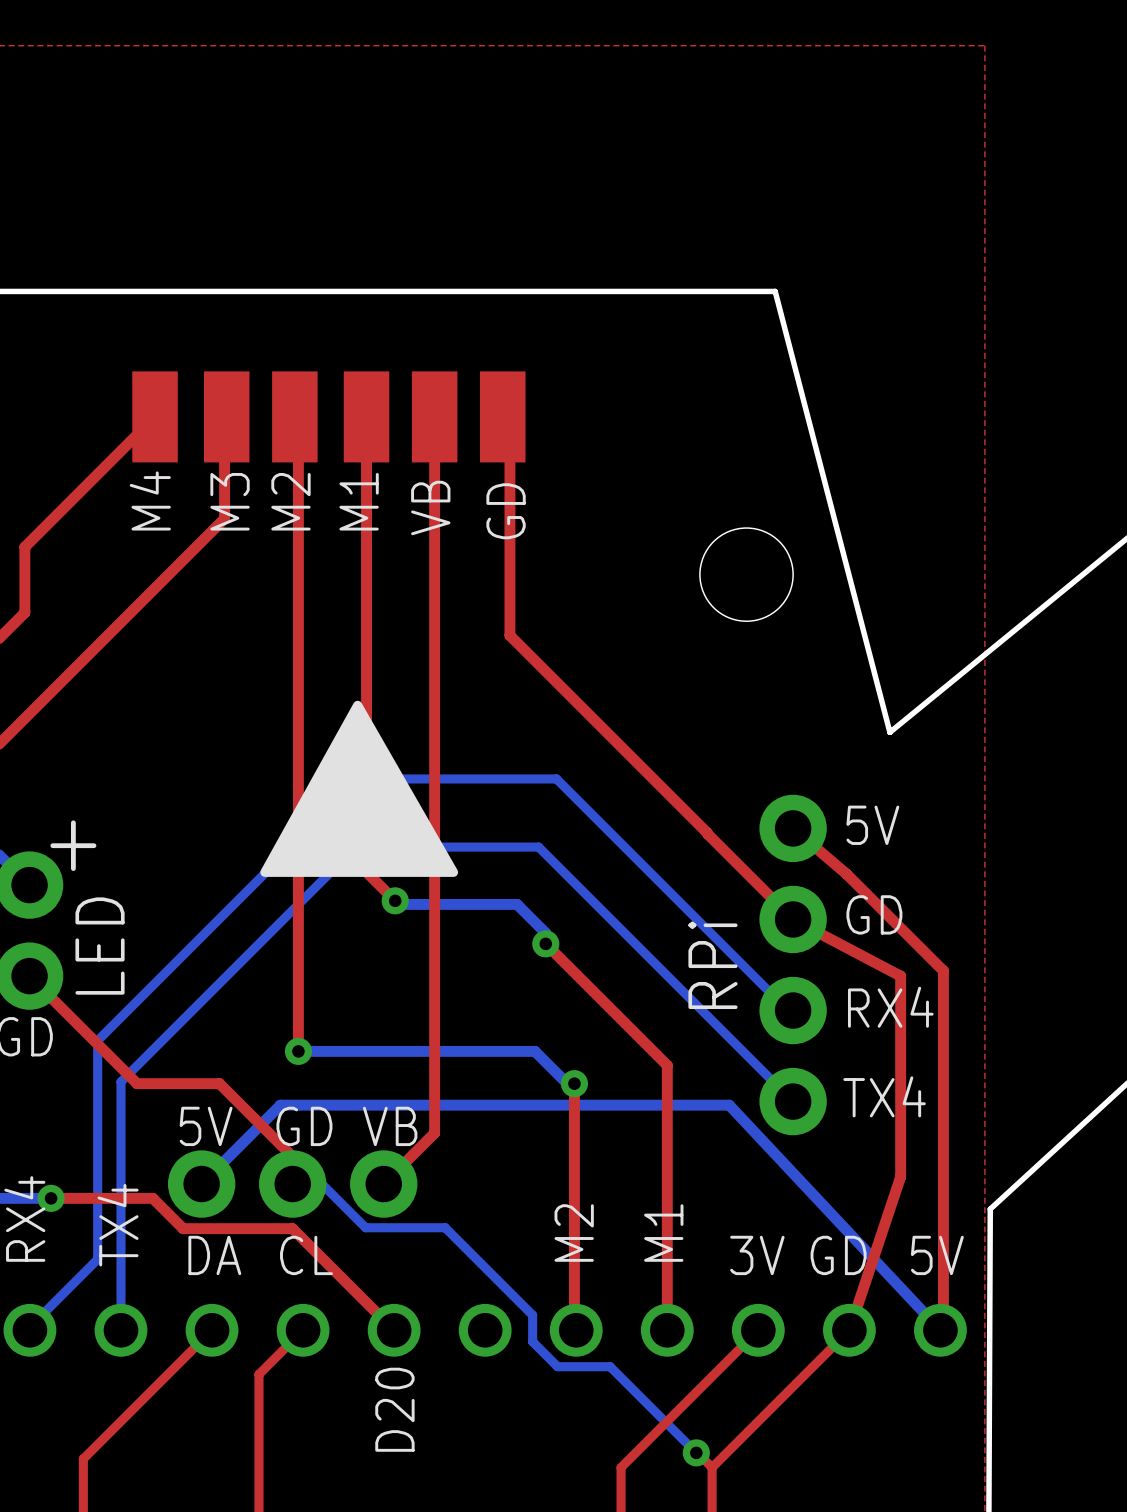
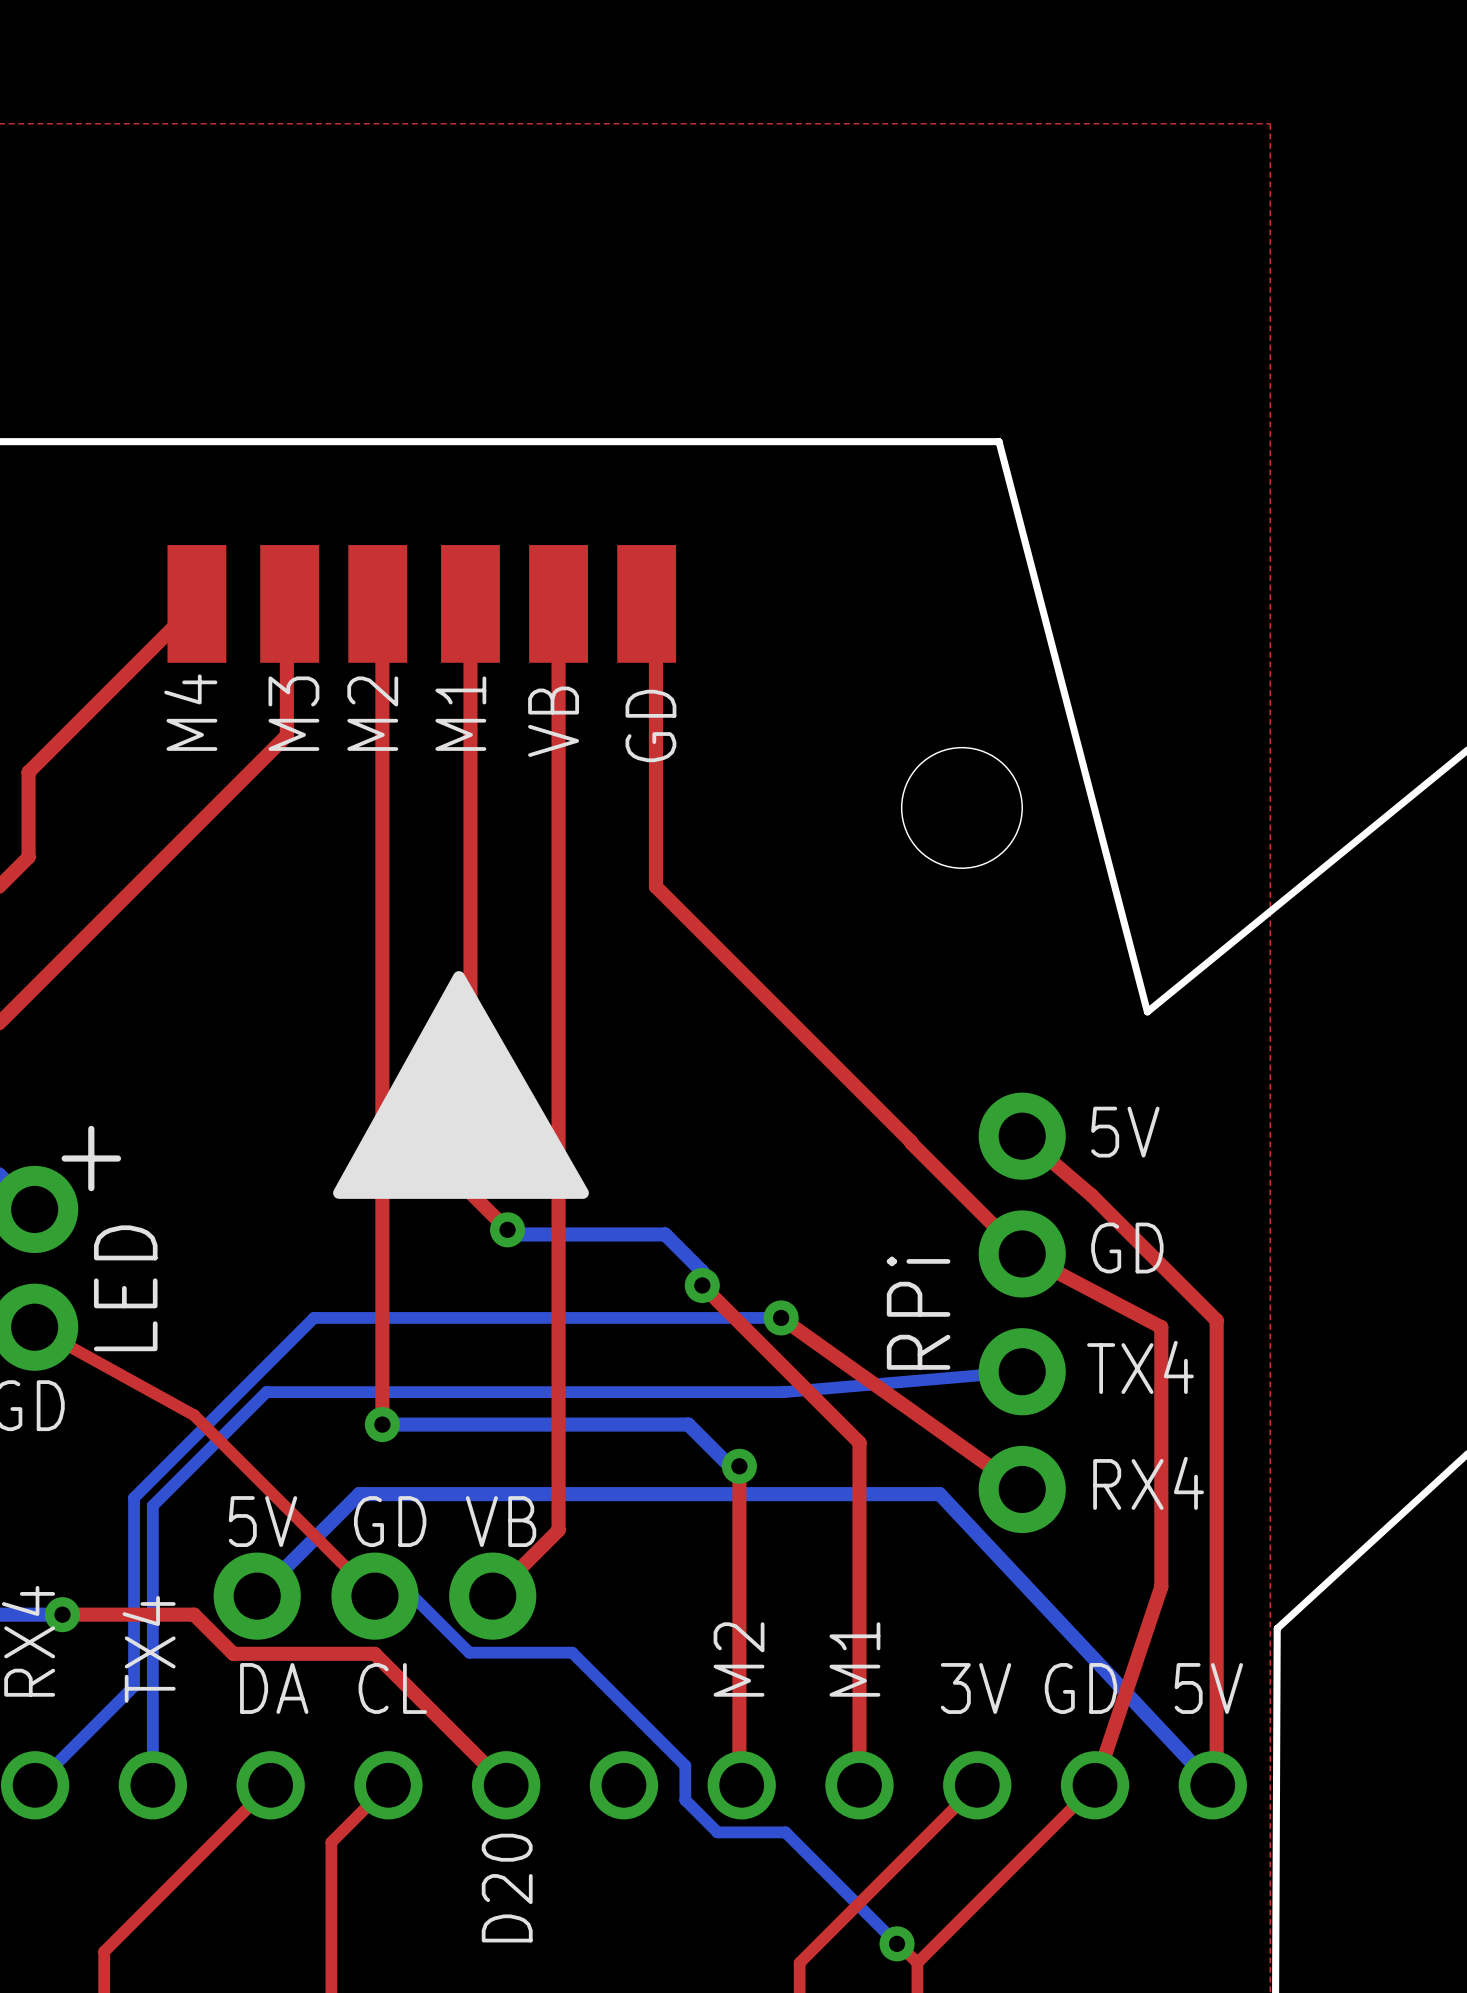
top track: none -> (781, 1317) (1022, 1489)
bottom track: none -> (781, 1317) (314, 1317) (134, 1497) (134, 1686) (35, 1785)
via: none -> (781, 1317)
top track: (29, 976) (137, 1083) (219, 1083) (292, 1156) (292, 1184) -> (34, 1327) (194, 1415) (374, 1596)
text: RX4 (890, 1007) -> TX4 (1140, 1367)
bottom track: (793, 1010) (788, 1010) (556, 778) (359, 778) (97, 1040) (97, 1259) (36, 1320) -> none
text: TX4 (884, 1096) -> RX4 (1148, 1483)
bottom track: (793, 1101) (538, 847) (355, 847) (120, 1081) (120, 1114) -> (1022, 1371) (783, 1392) (266, 1392) (152, 1505)

